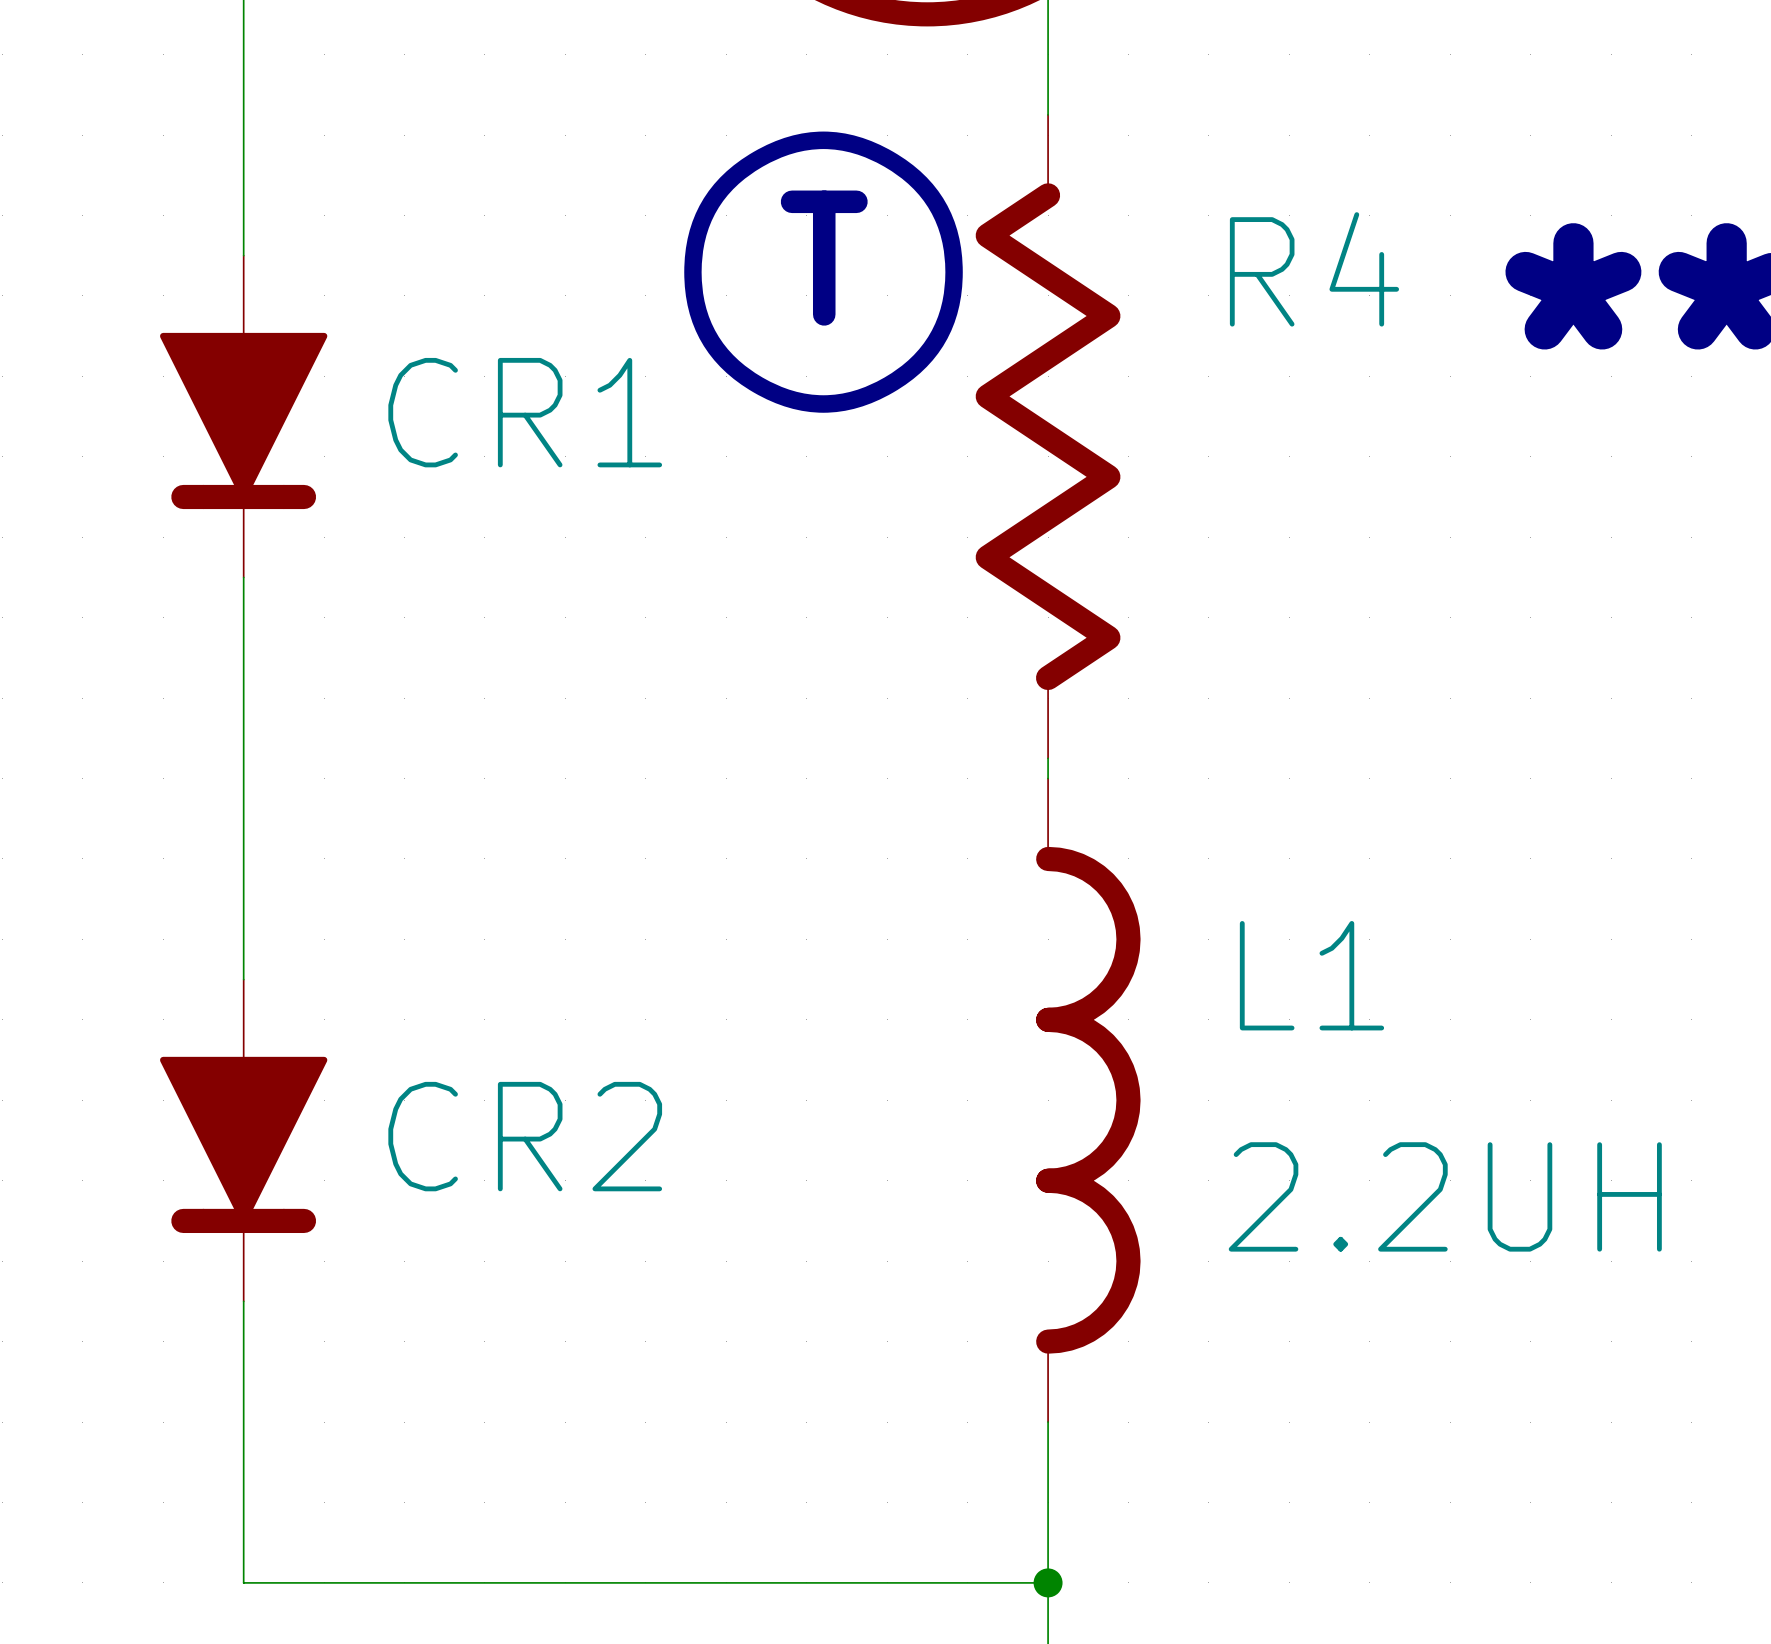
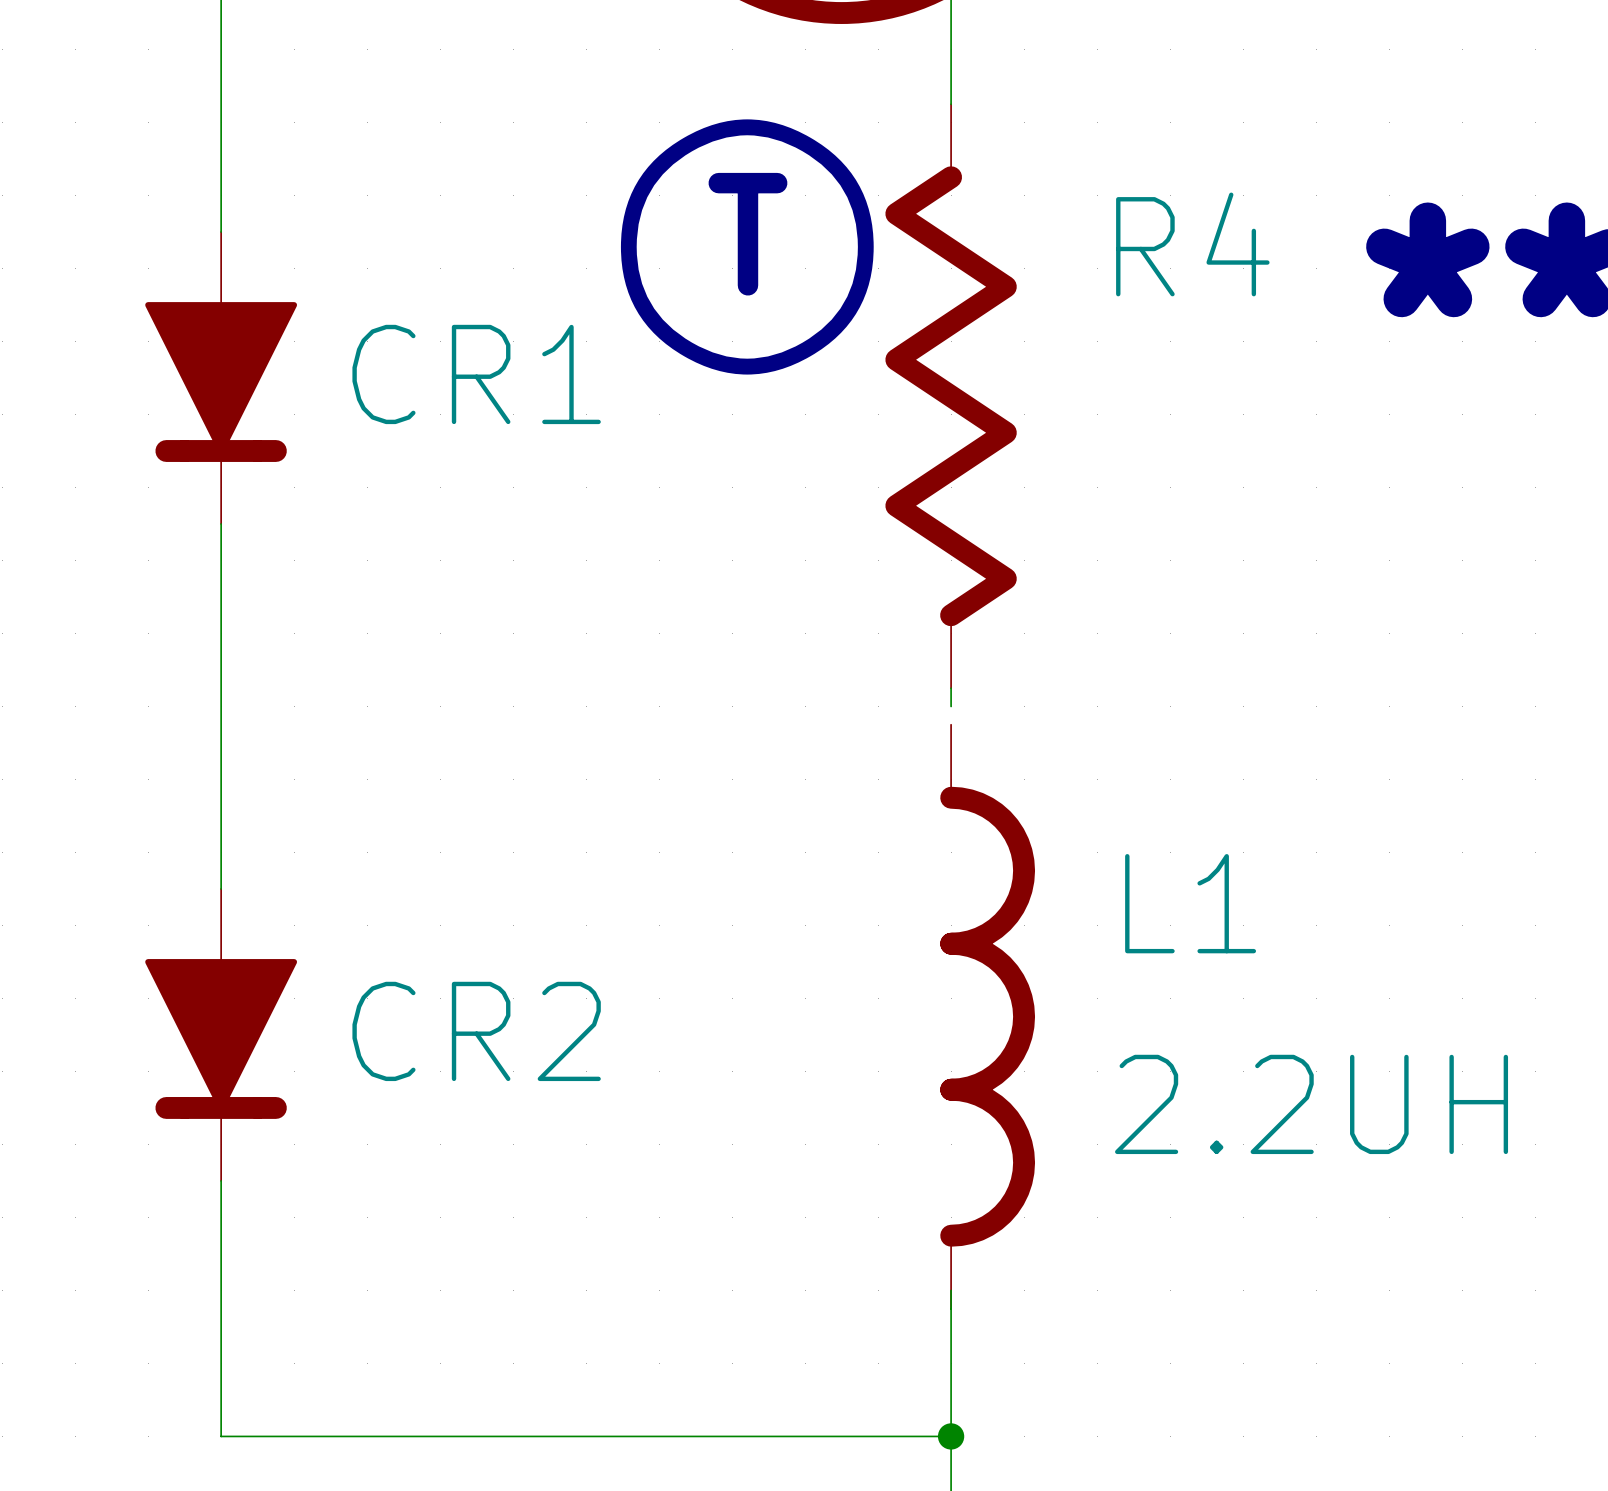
part position: (1088, 1100) -> (987, 1016)

